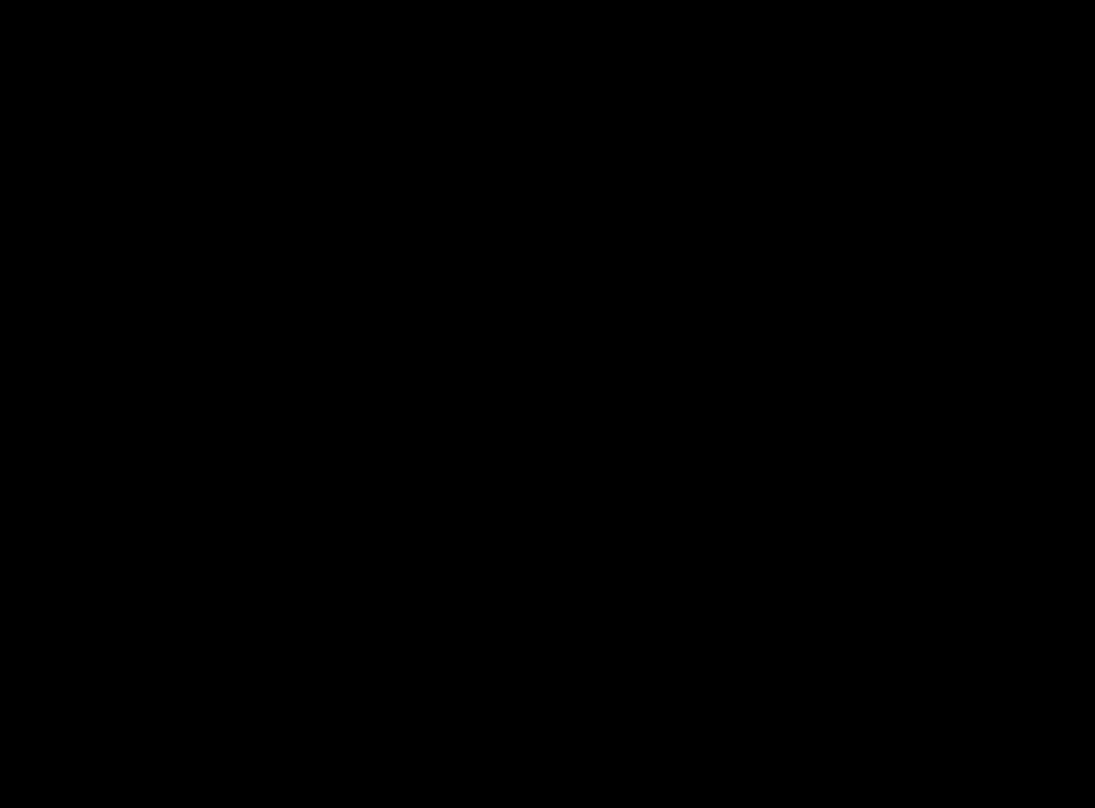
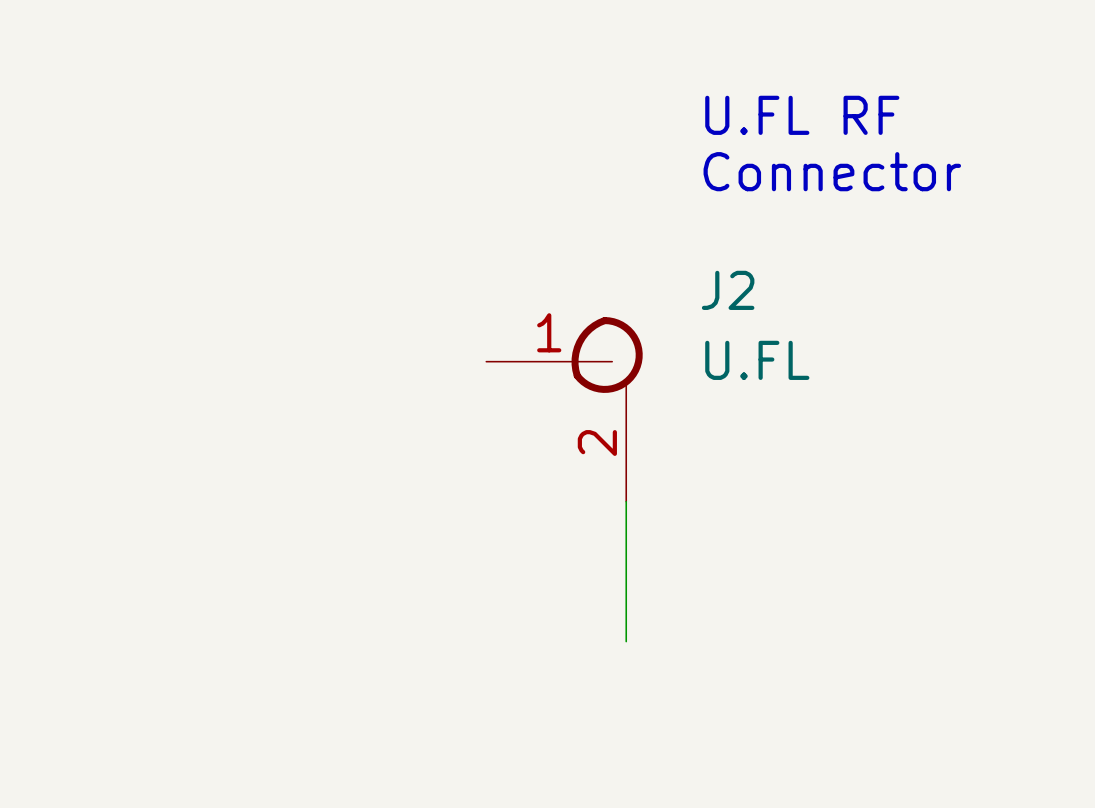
text: none -> U.FL RF (802, 115)
text: none -> Connector (832, 171)
J2: none -> U.FL (564, 409)
wire: none -> (626, 501) (626, 641)

